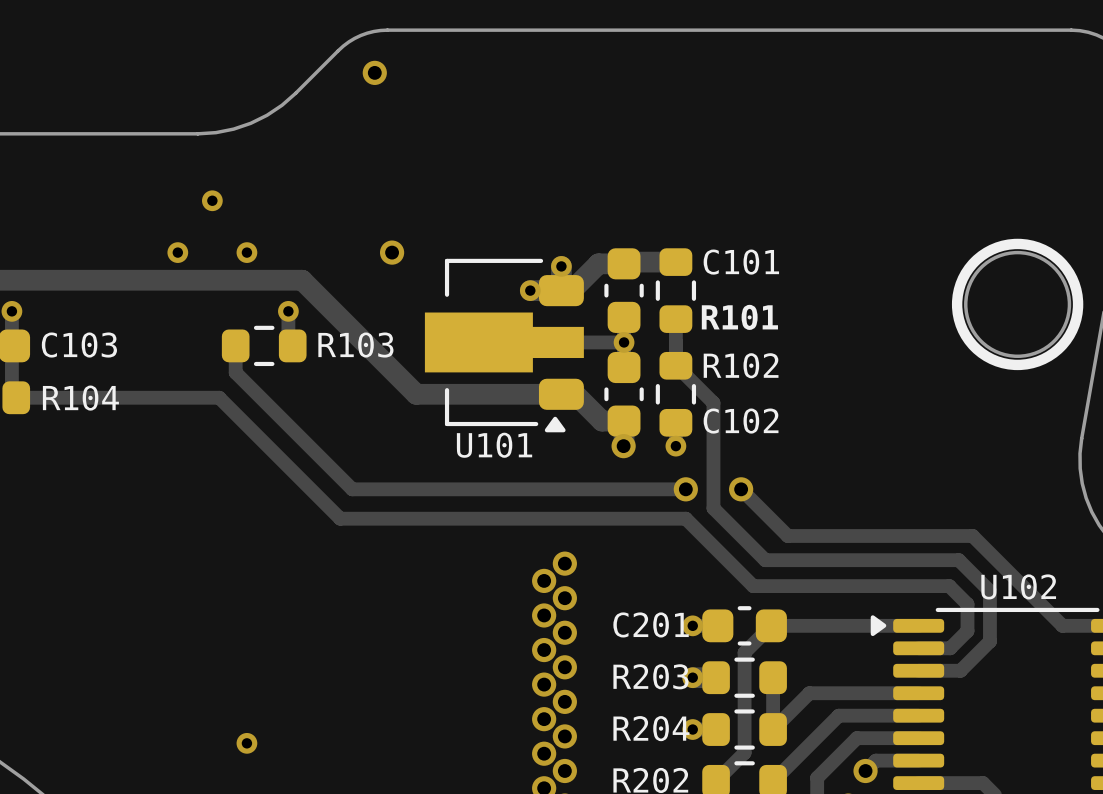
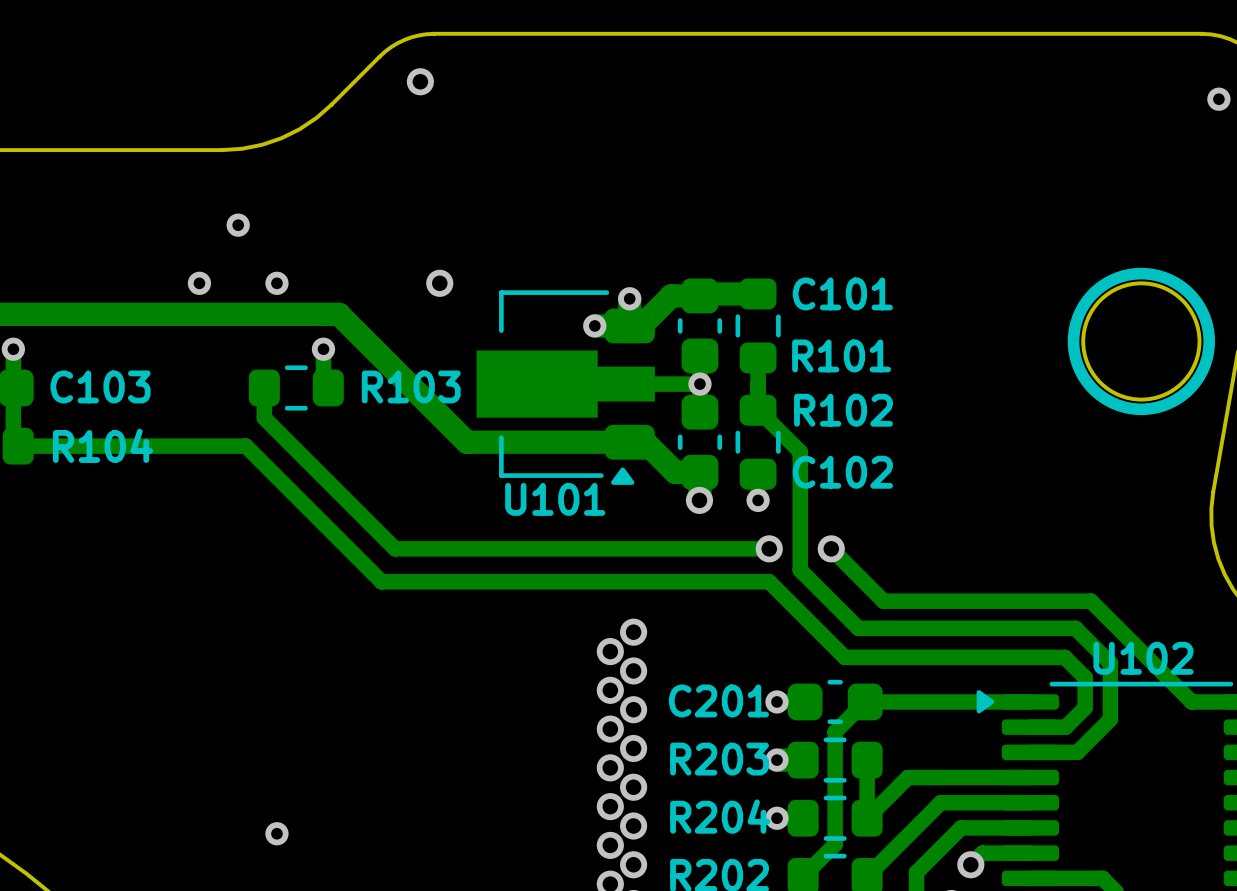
via: none -> (1218, 99)

